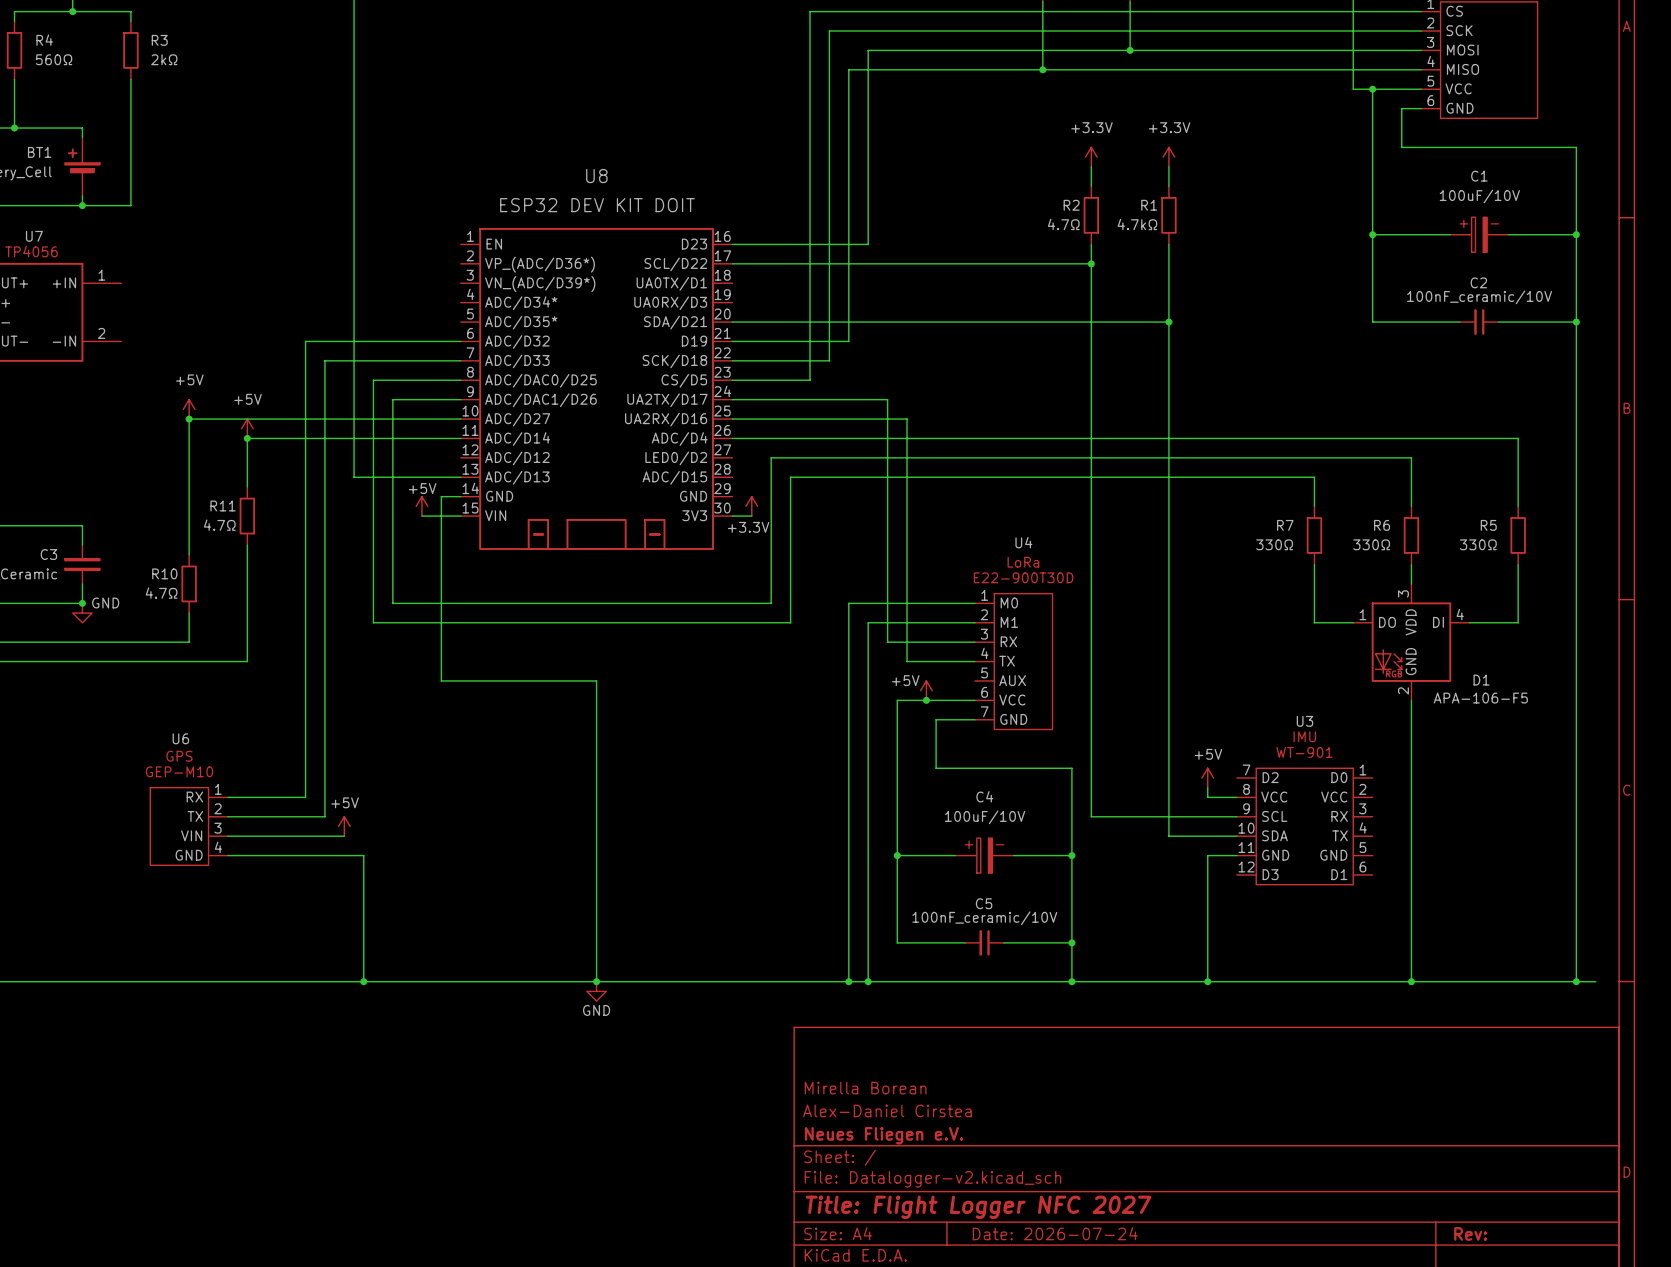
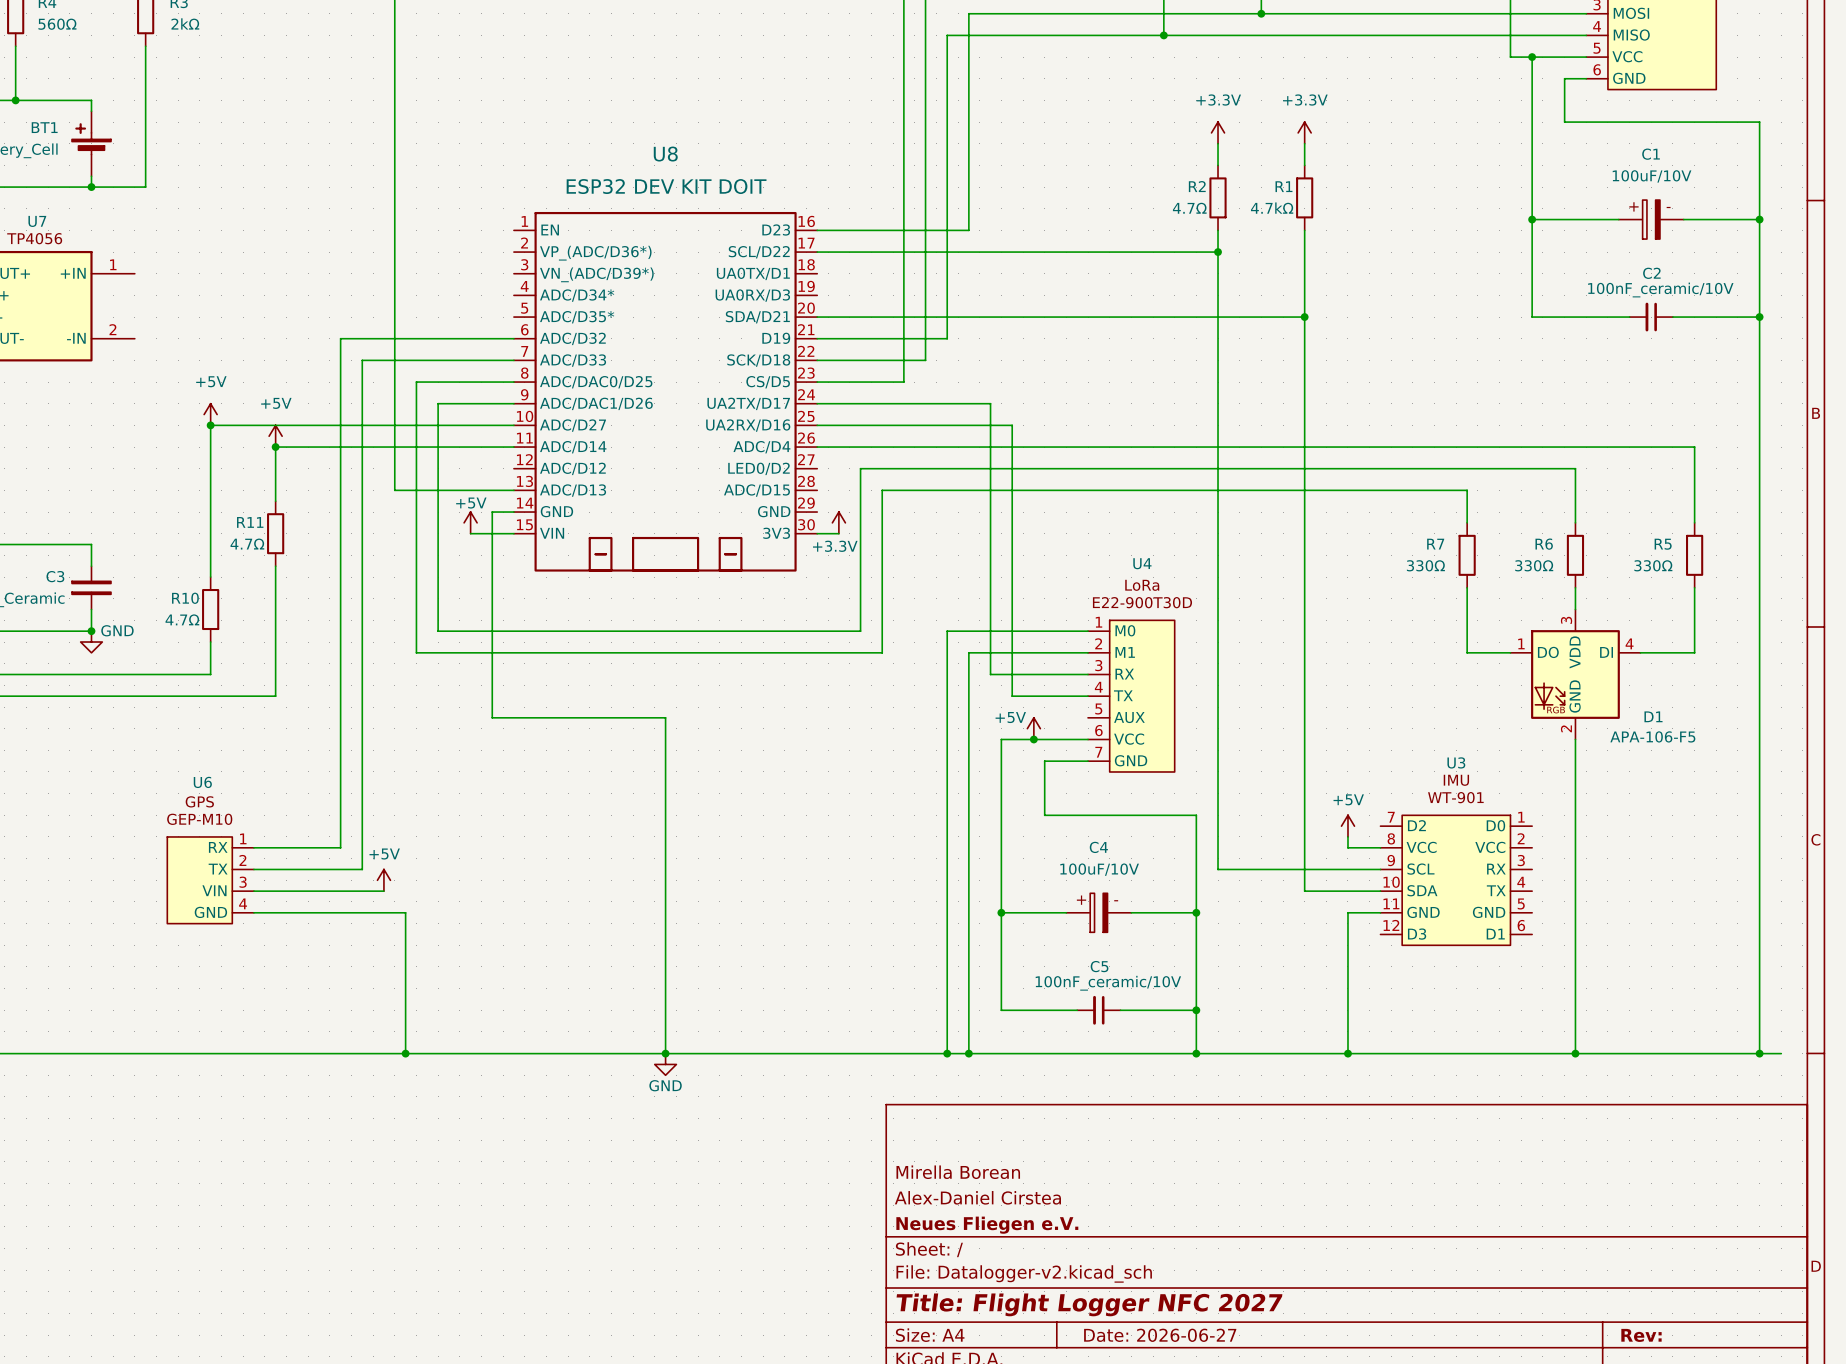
title block: Date: 2026-07-24 (1055, 1233) -> Date: 2026-06-27 (1160, 1335)

